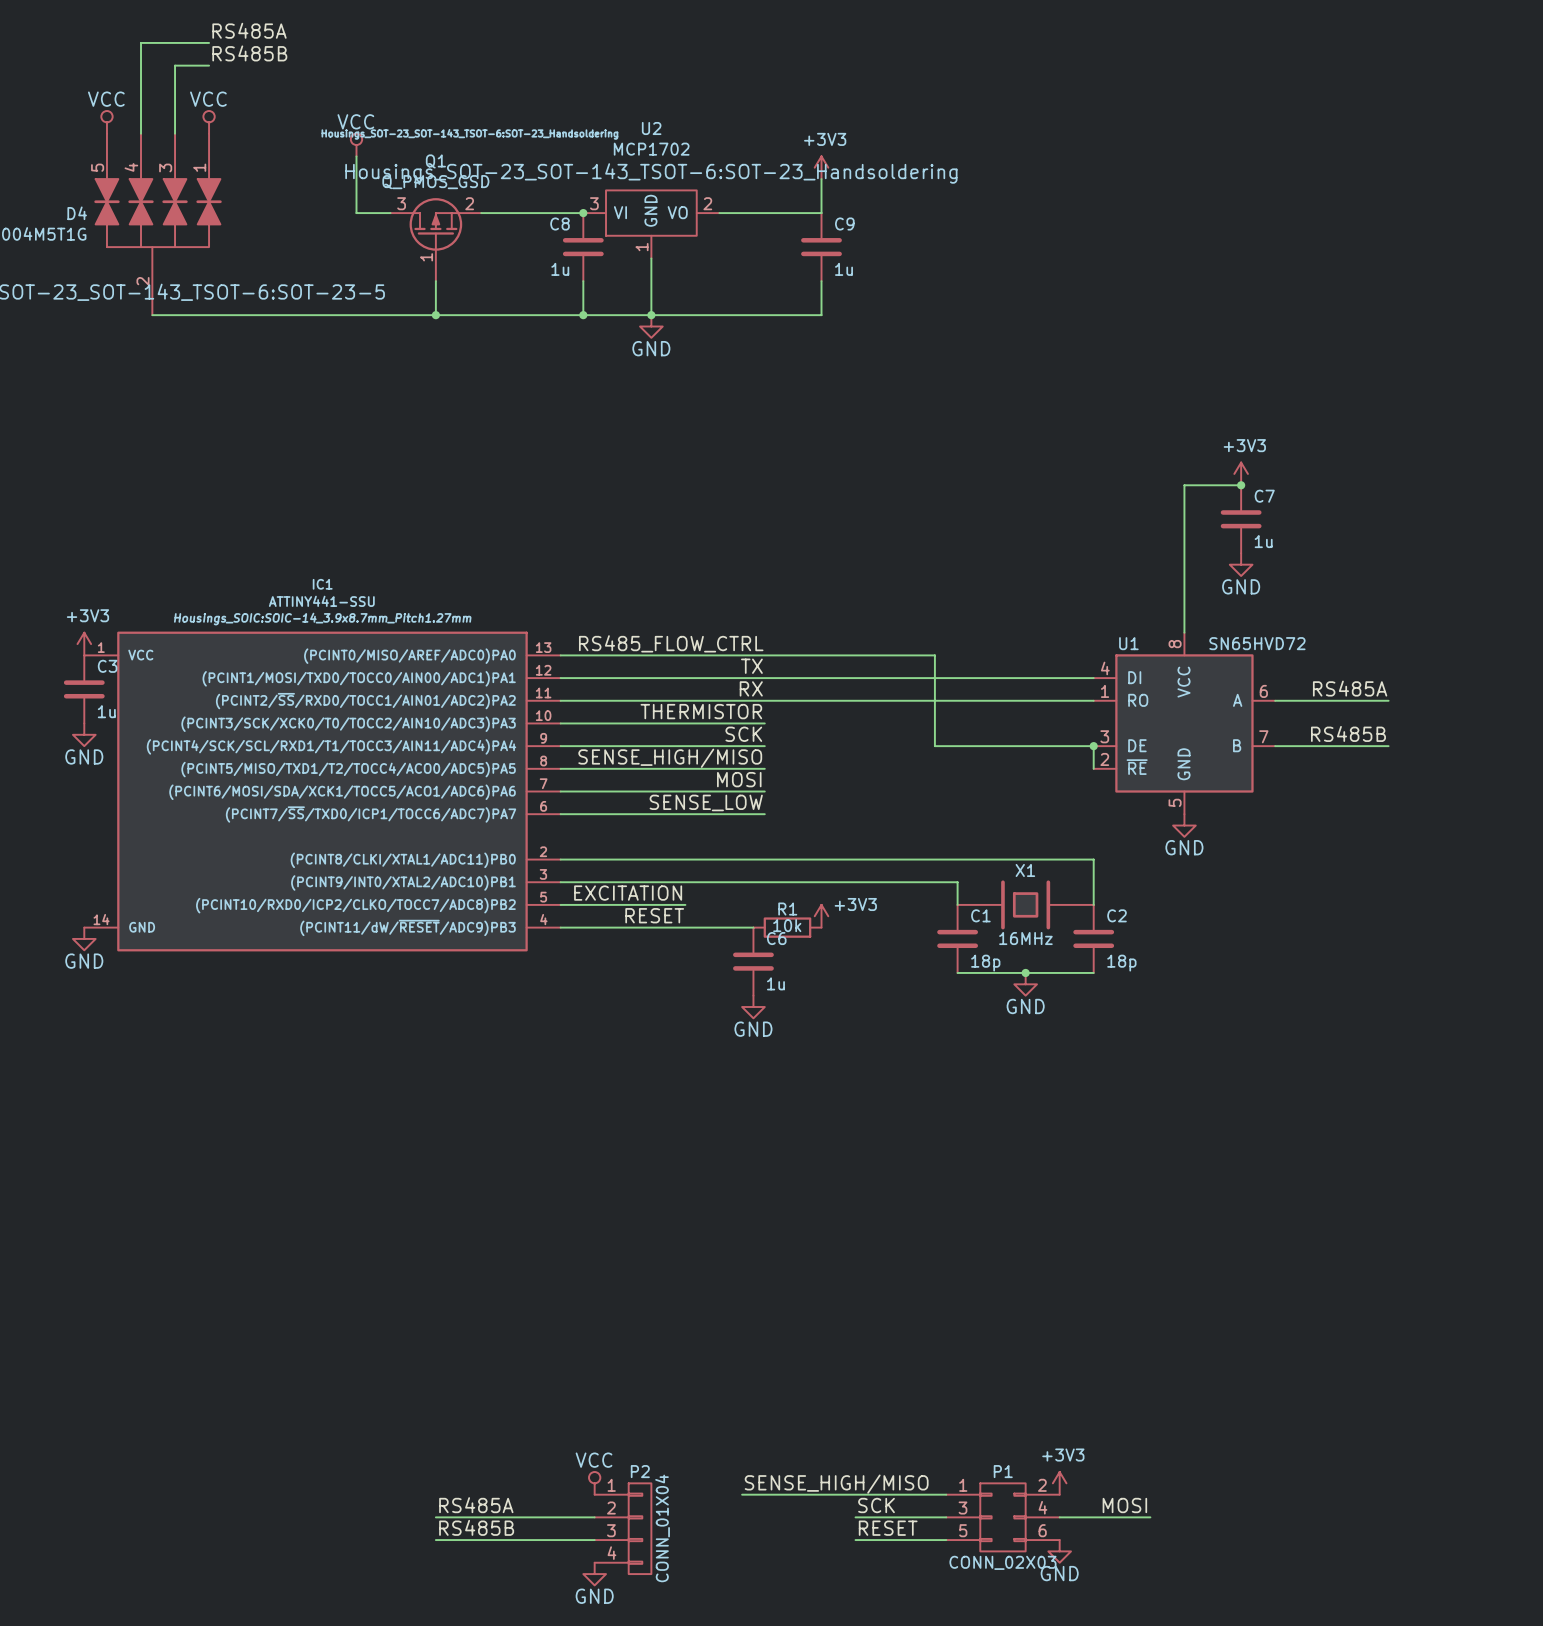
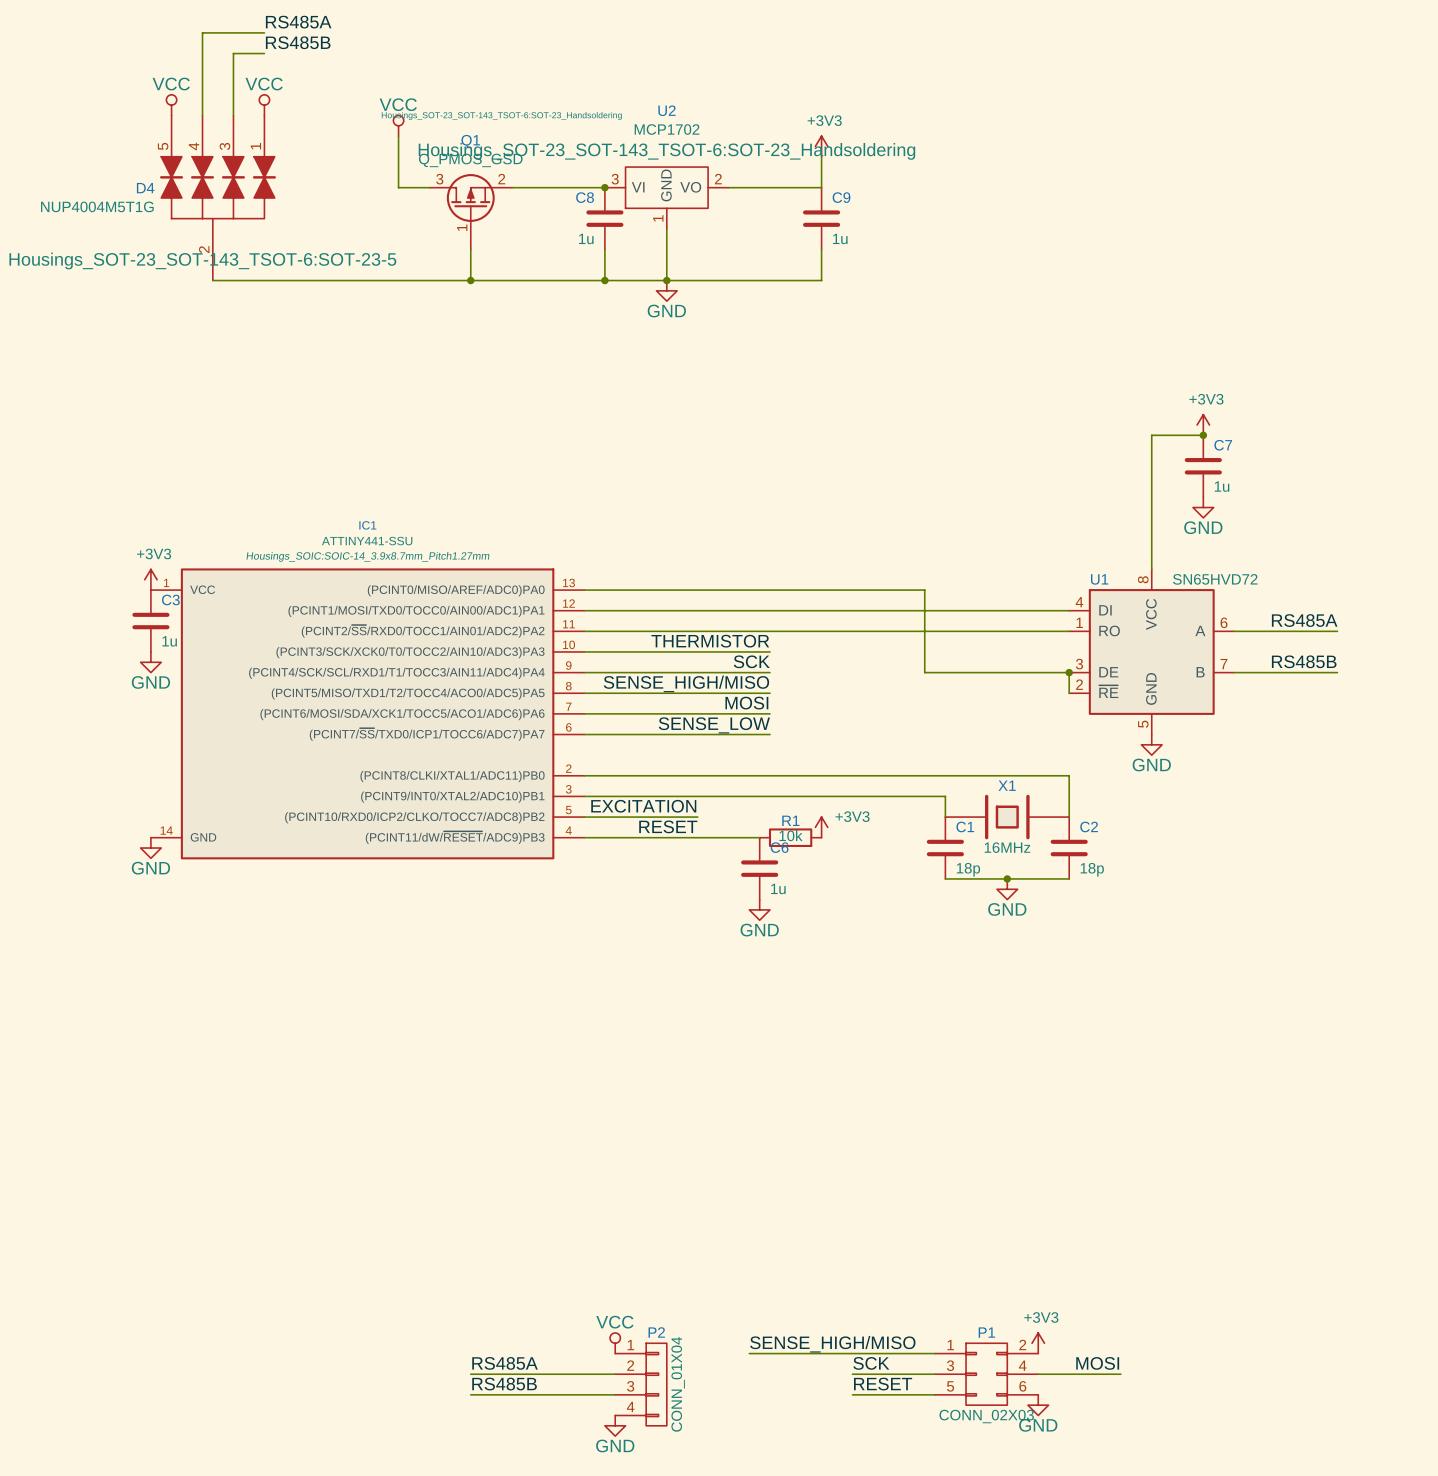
label: RS485_FLOW_CTRL (671, 643) -> none
label: TX (751, 666) -> none
label: RX (751, 688) -> none

